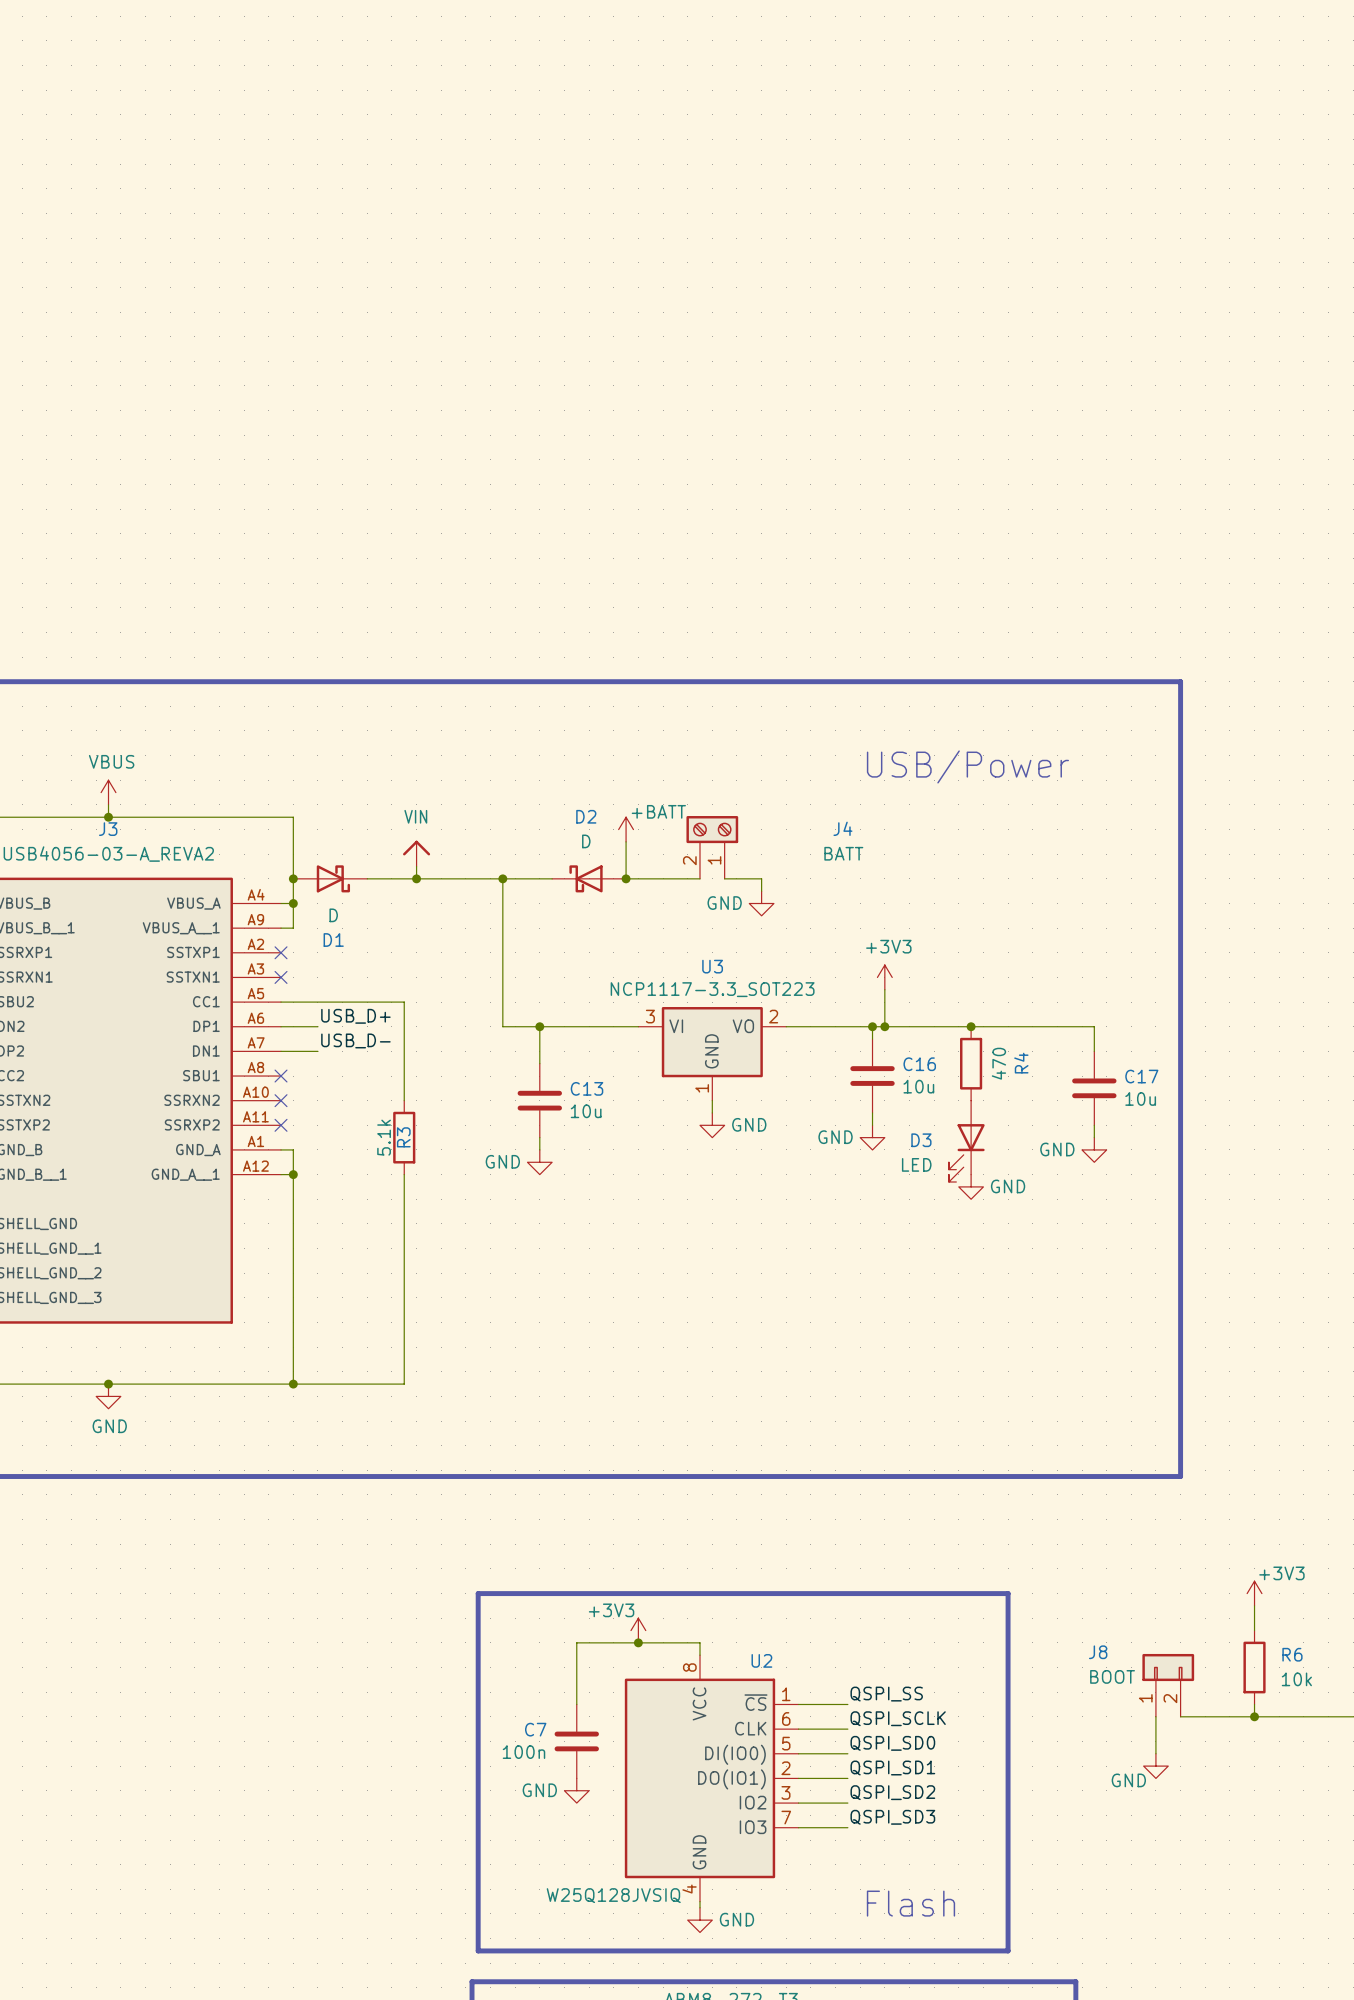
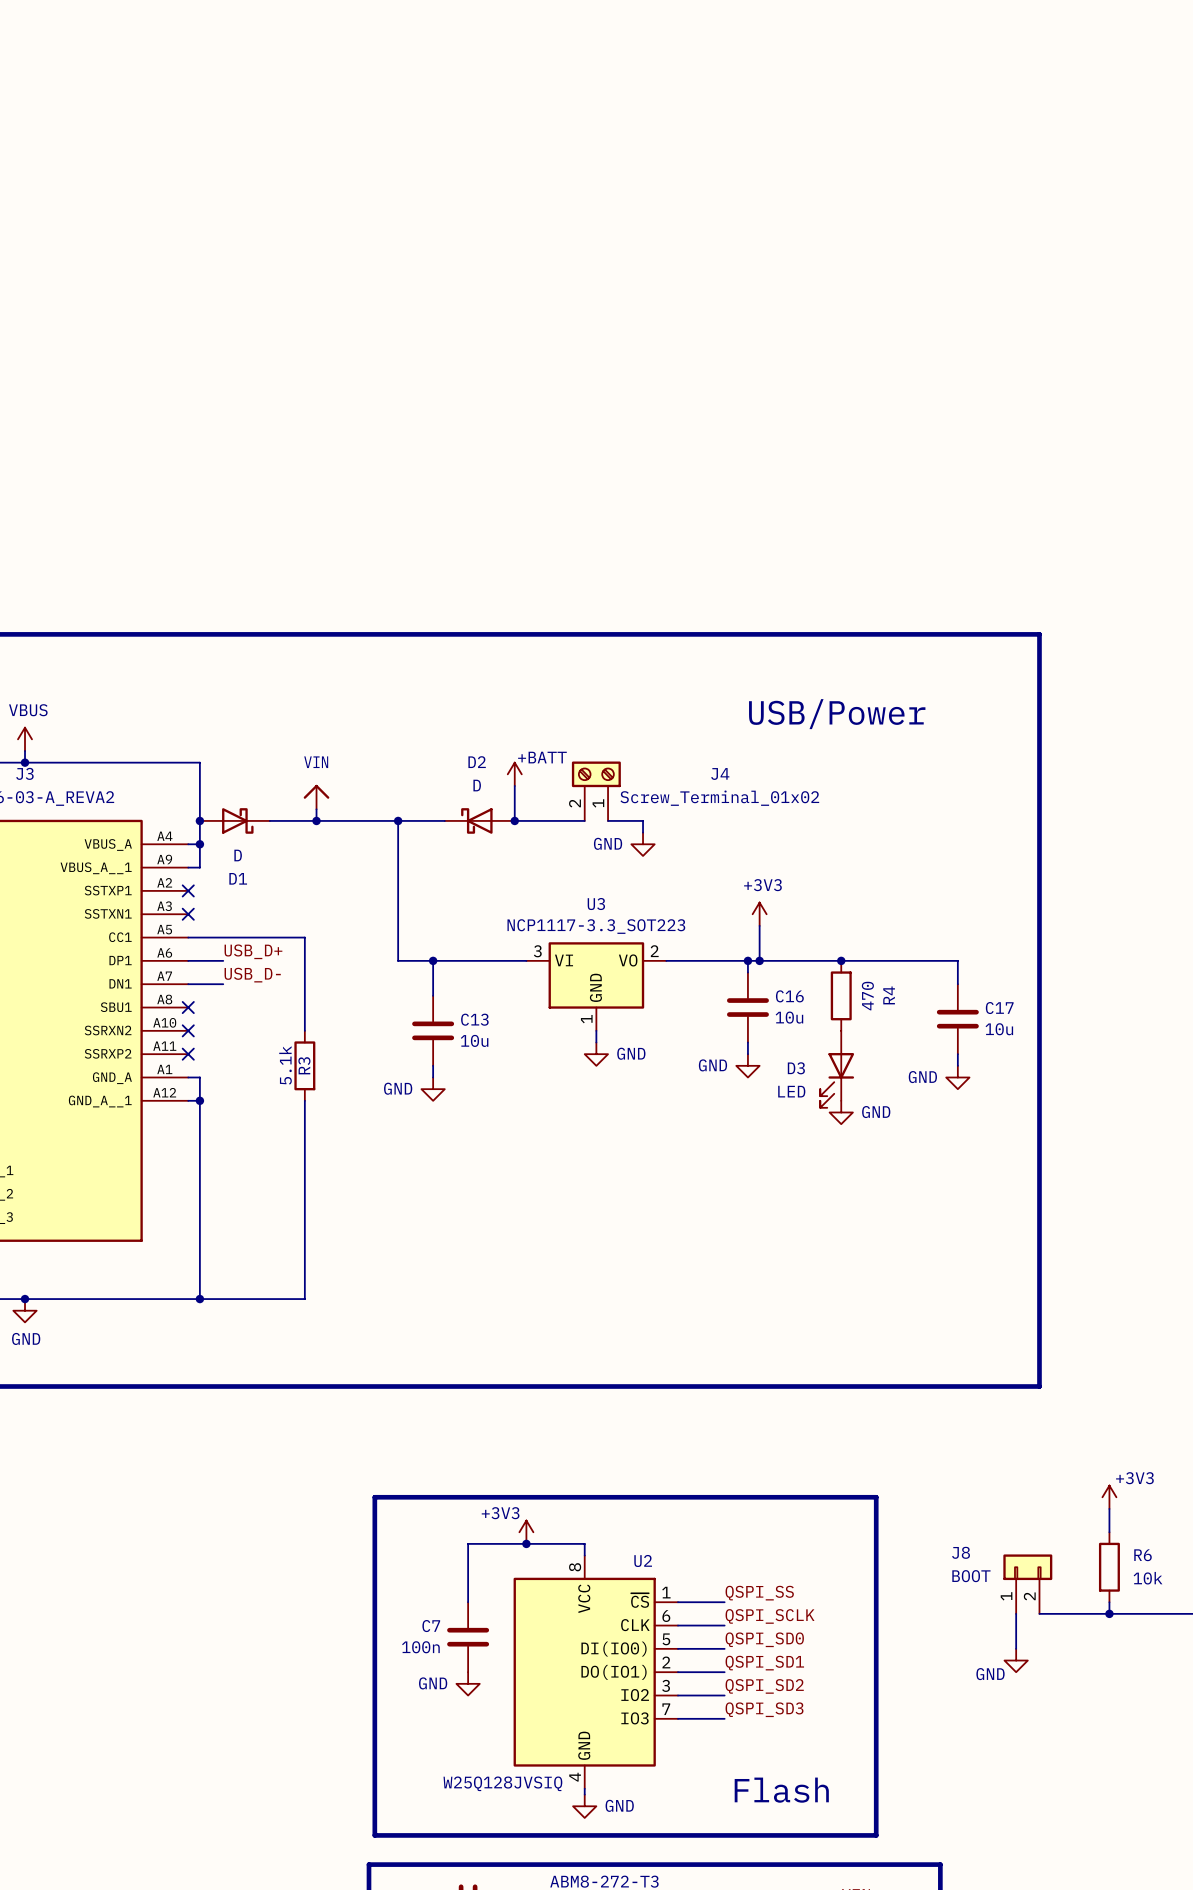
J4 value: BATT (843, 853) -> Screw_Terminal_01x02 (719, 798)

